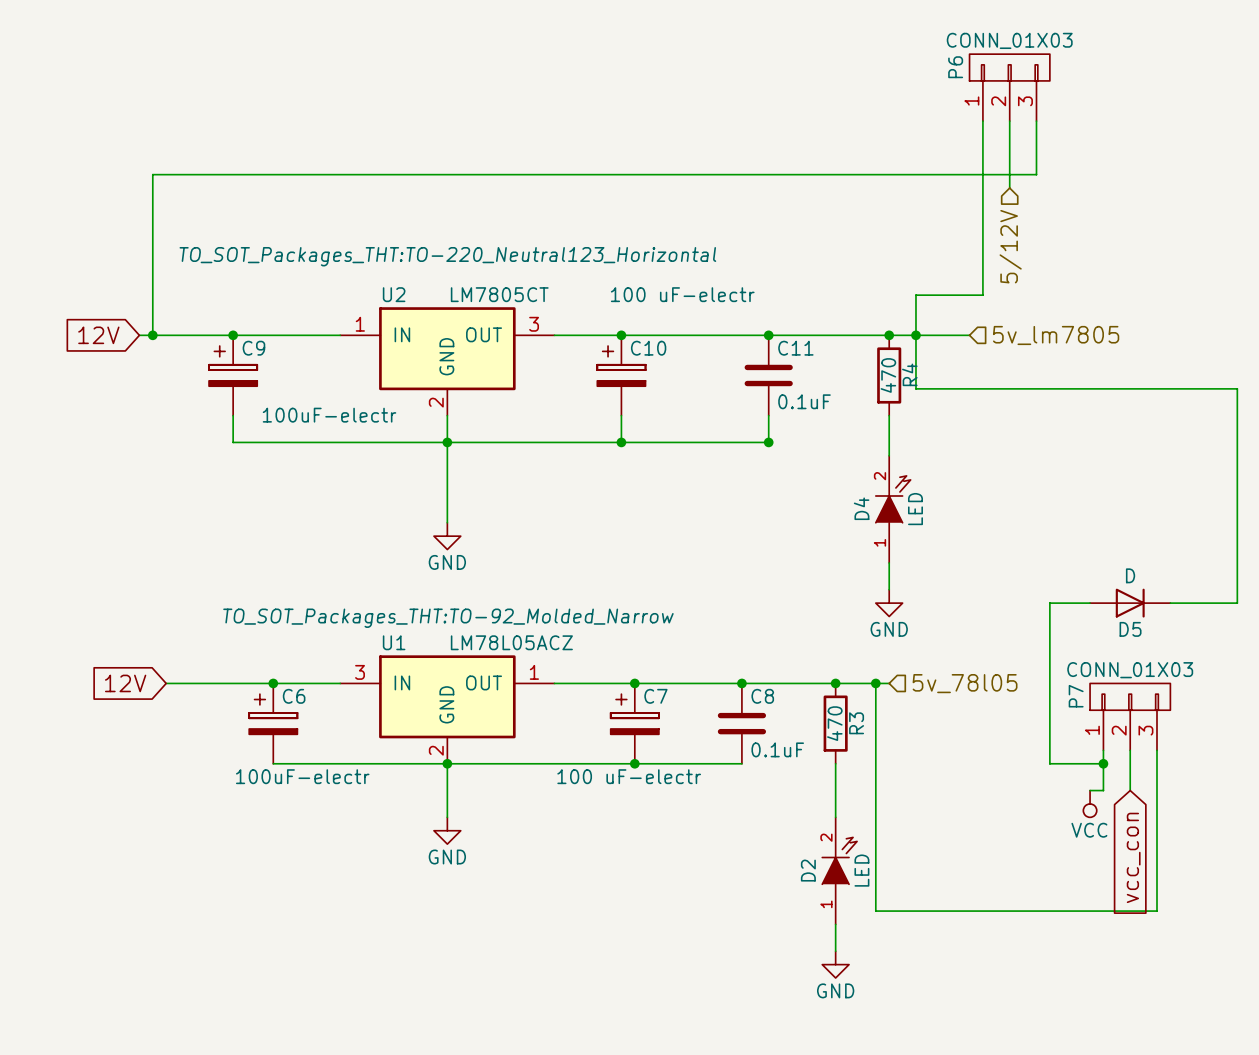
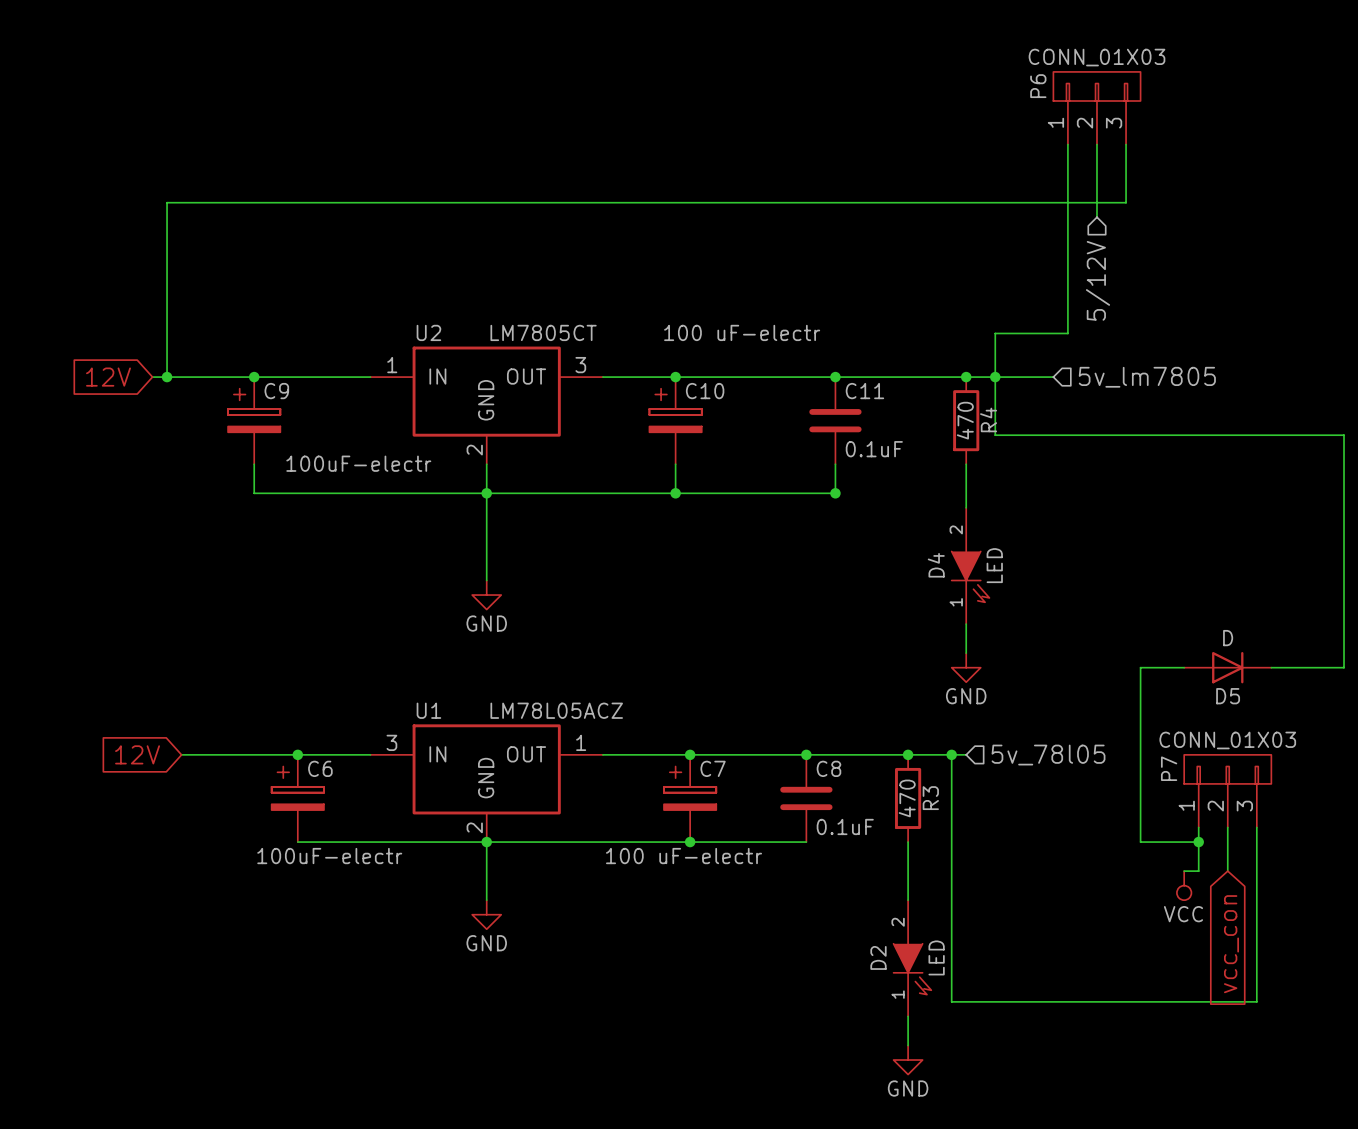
U2 text: TO_SOT_Packages_THT:TO-220_Neutral123_Horizontal (447, 256) -> none
D4 symbol: [875, 455, 911, 563] -> [951, 507, 990, 625]
U1 text: TO_SOT_Packages_THT:TO-92_Molded_Narrow (448, 618) -> none
D2 symbol: [822, 817, 858, 925] -> [893, 900, 932, 1017]

